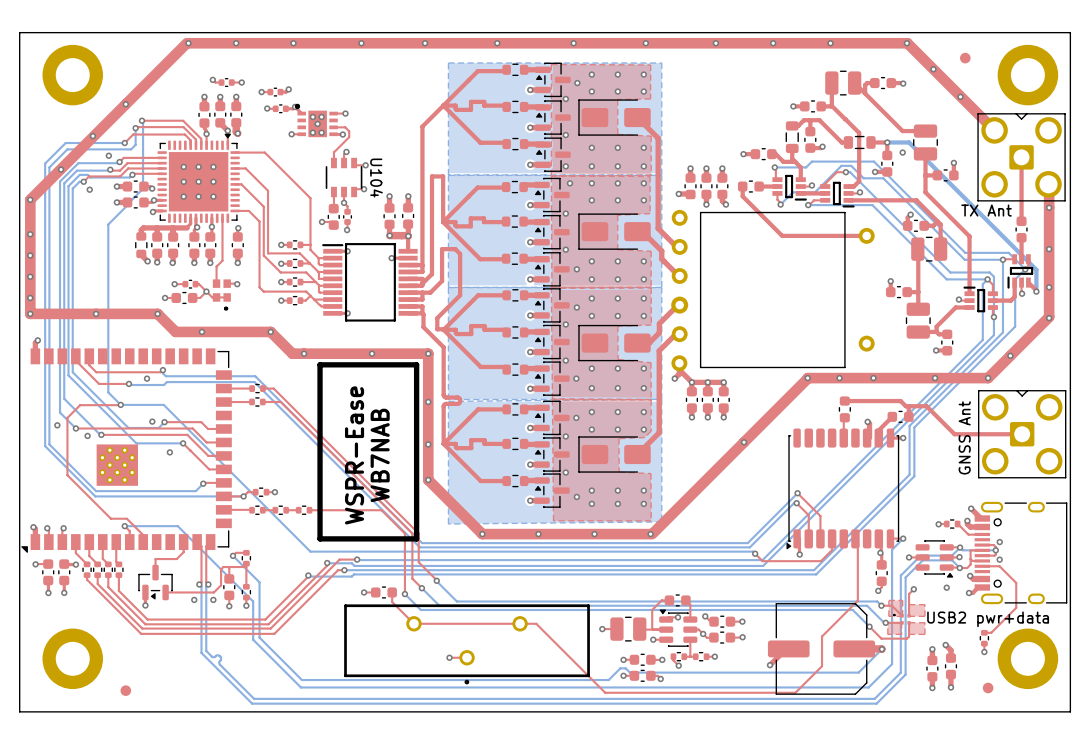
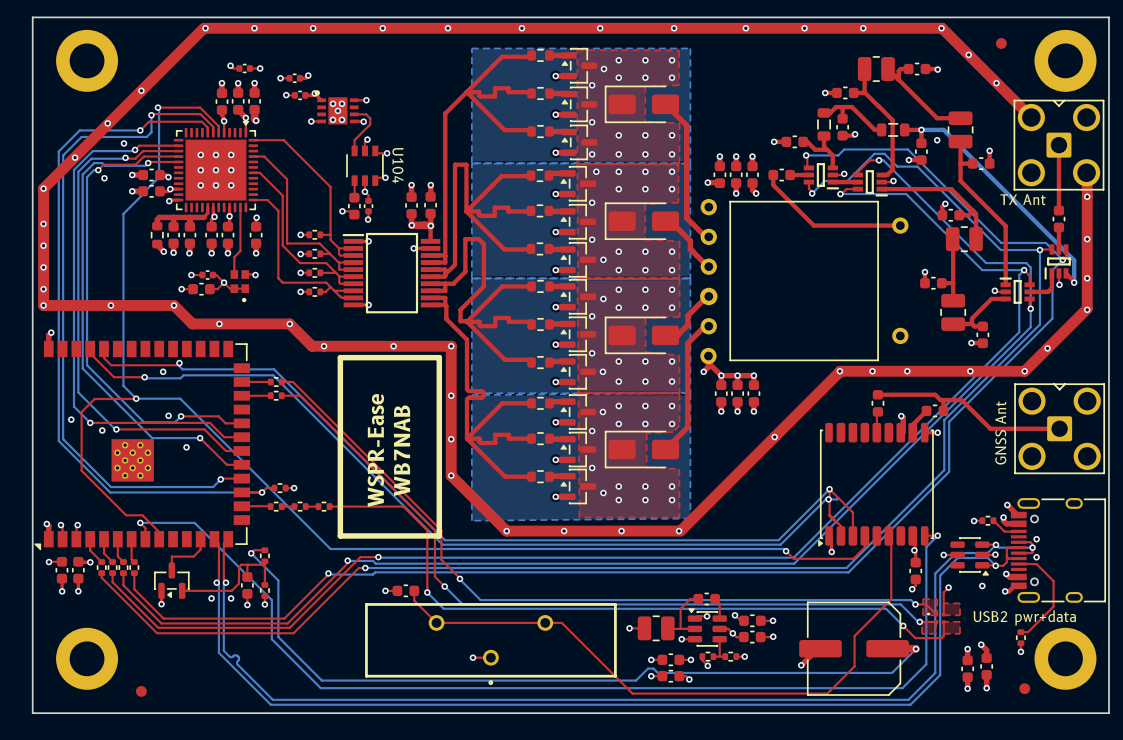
top track: none -> (829, 489) (829, 515) (837, 522)
bottom track: none -> (838, 497) (828, 499)
top track: (796, 503) (808, 515) (808, 529) -> (829, 514) (840, 526)

